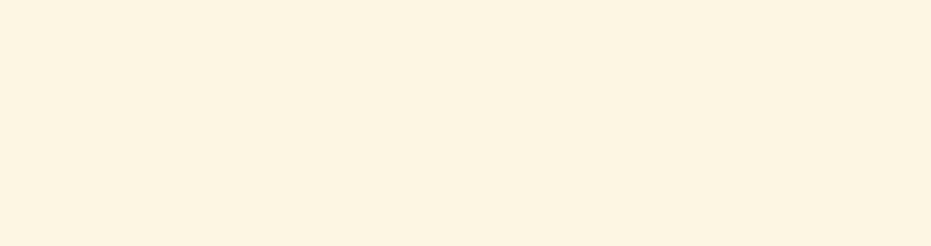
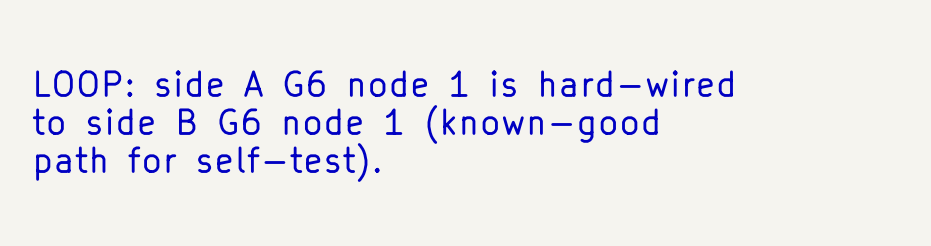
text: none -> LOOP: side A G6 node 1 is hard-wired (384, 83)
text: none -> to side B G6 node 1 (known-good (345, 124)
text: none -> path for self-test). (207, 162)

